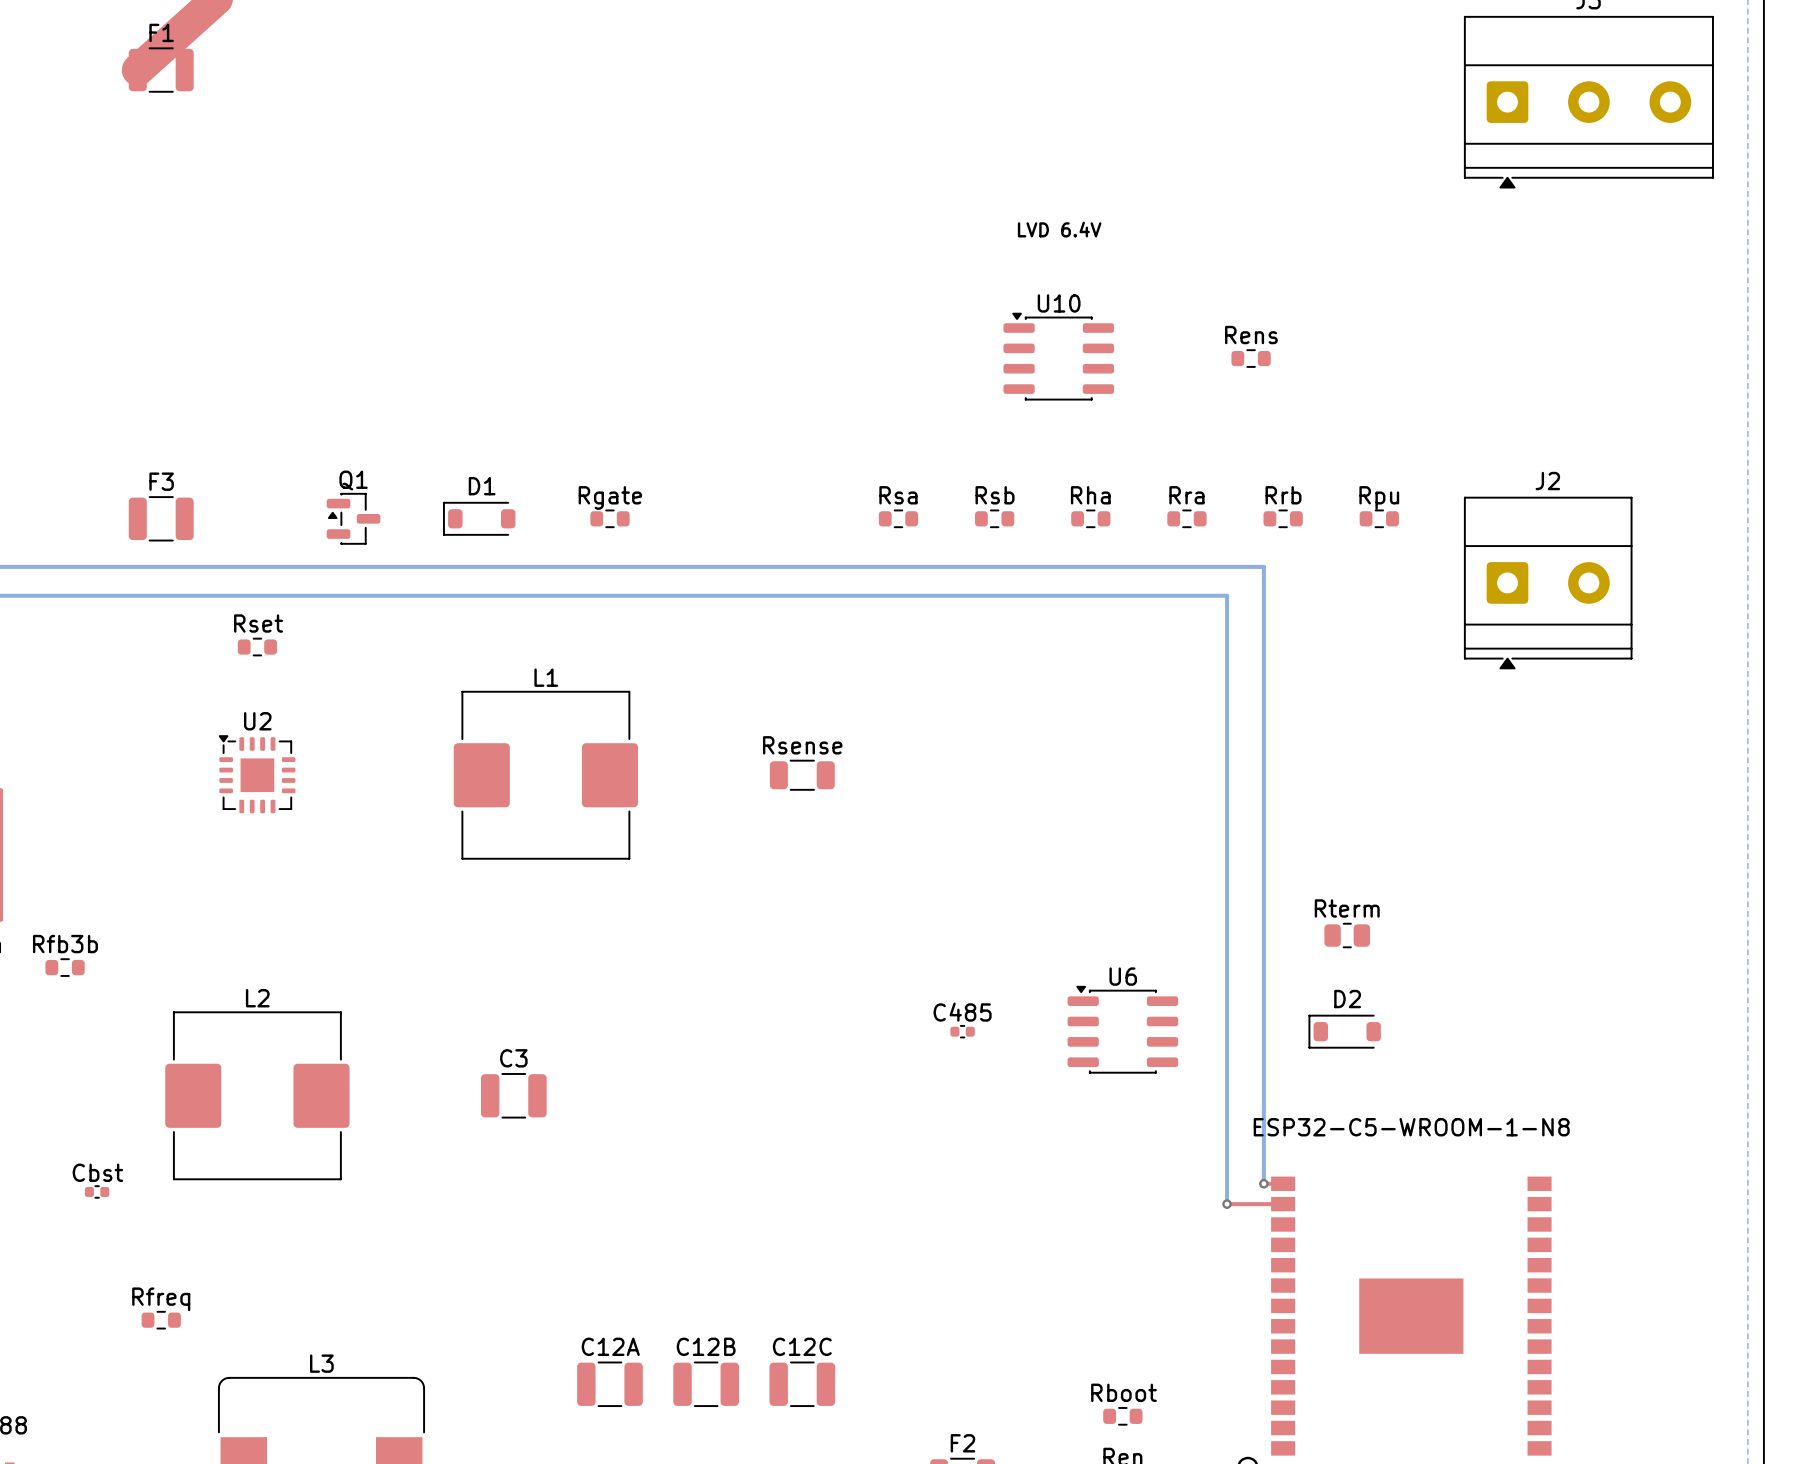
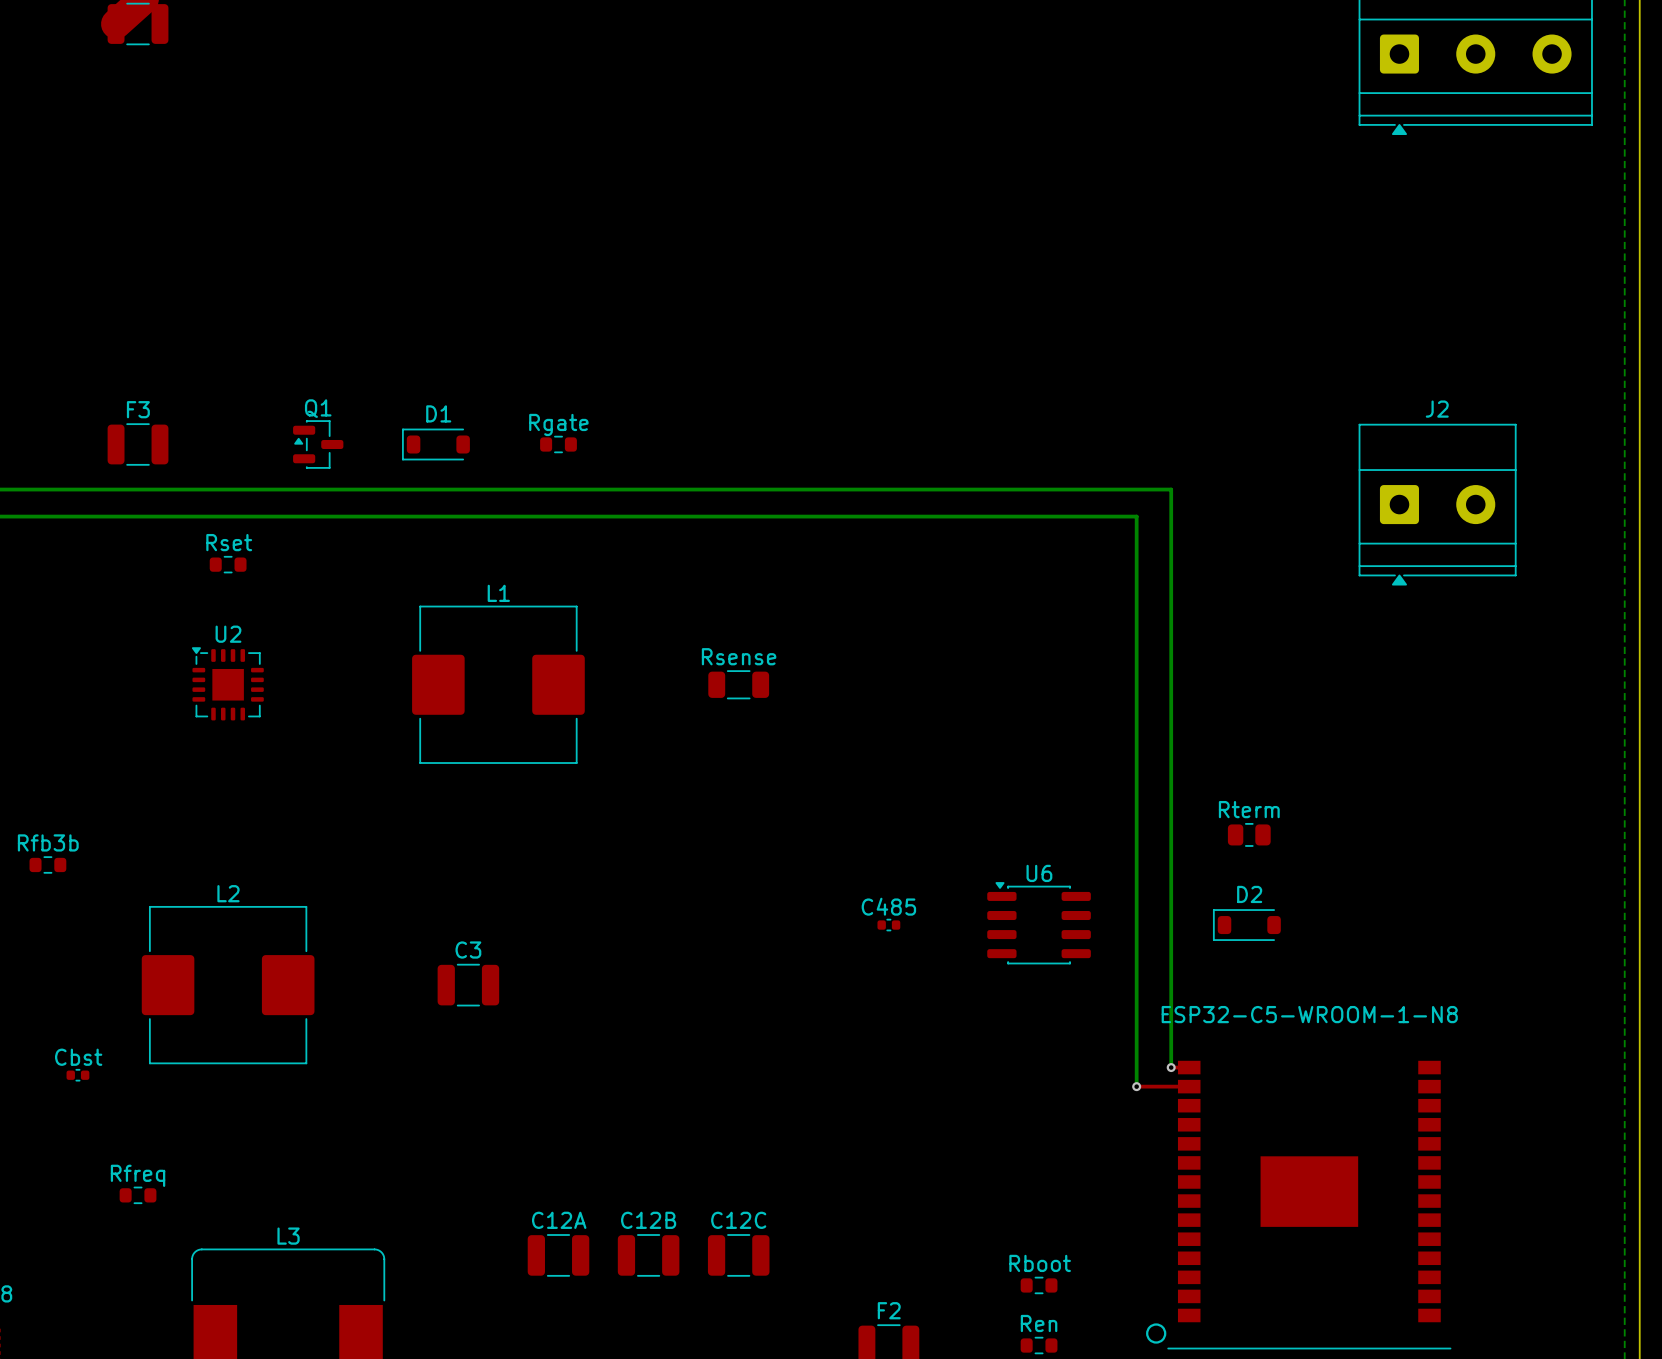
text: LVD 6.4V (1059, 229) -> none
U10: (1058, 356) -> none
Rens: (1251, 358) -> none
Rsa: (898, 518) -> none
Rsb: (994, 518) -> none
Rha: (1090, 518) -> none
Rra: (1186, 518) -> none
Rrb: (1283, 518) -> none
Rpu: (1379, 518) -> none

